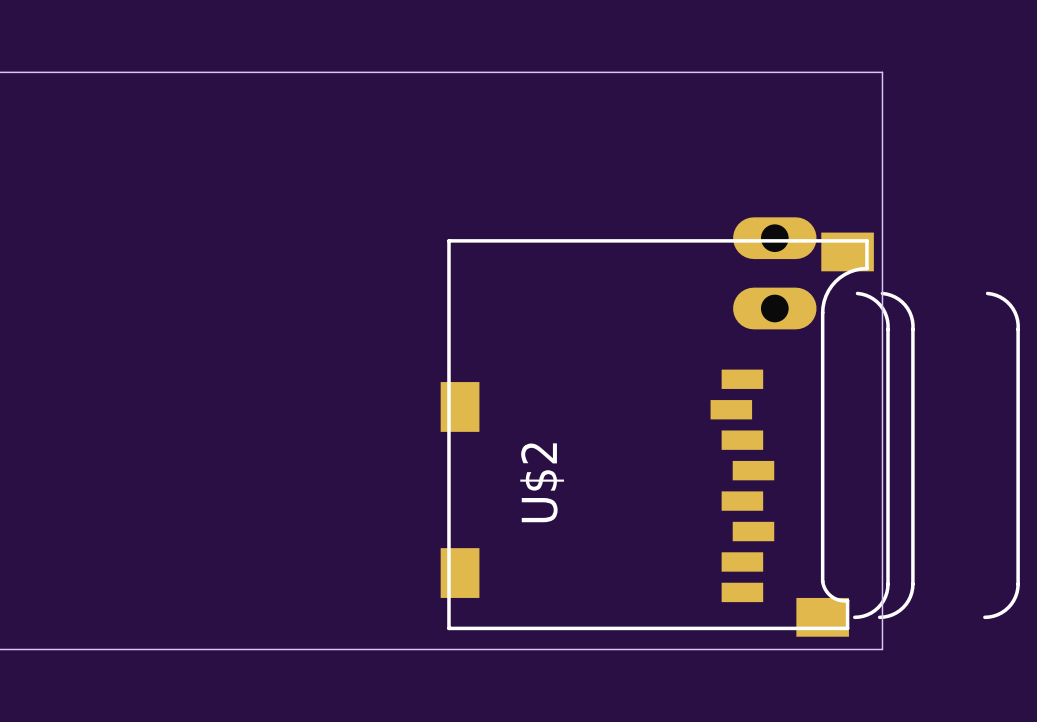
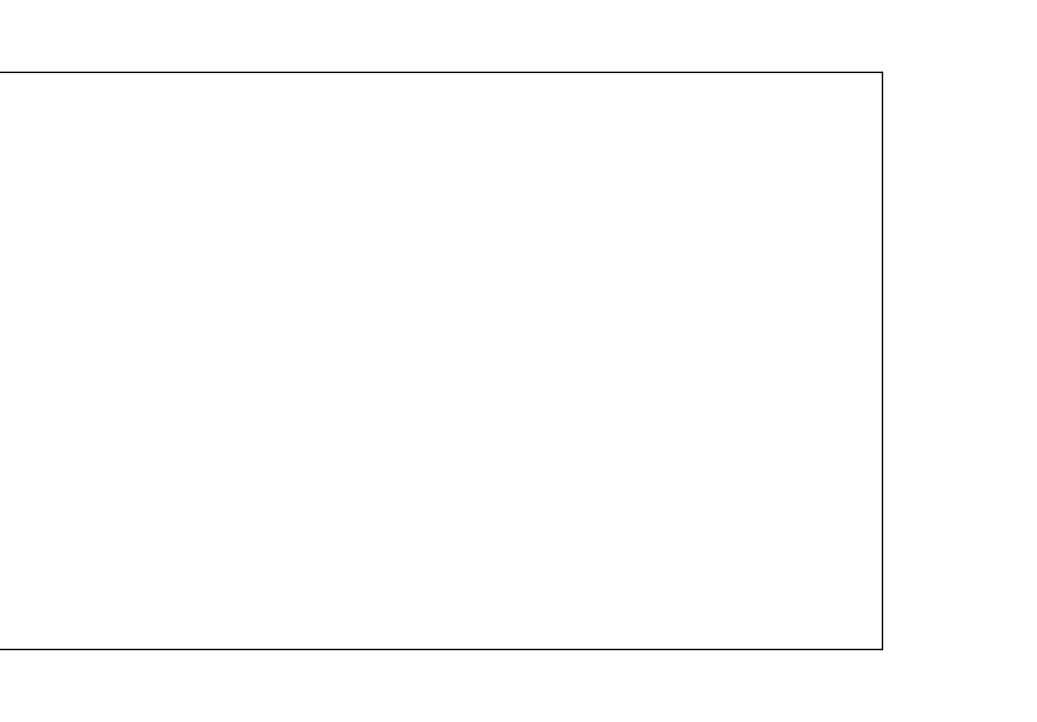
part: (774, 273) -> none
U$2: (730, 434) -> none

